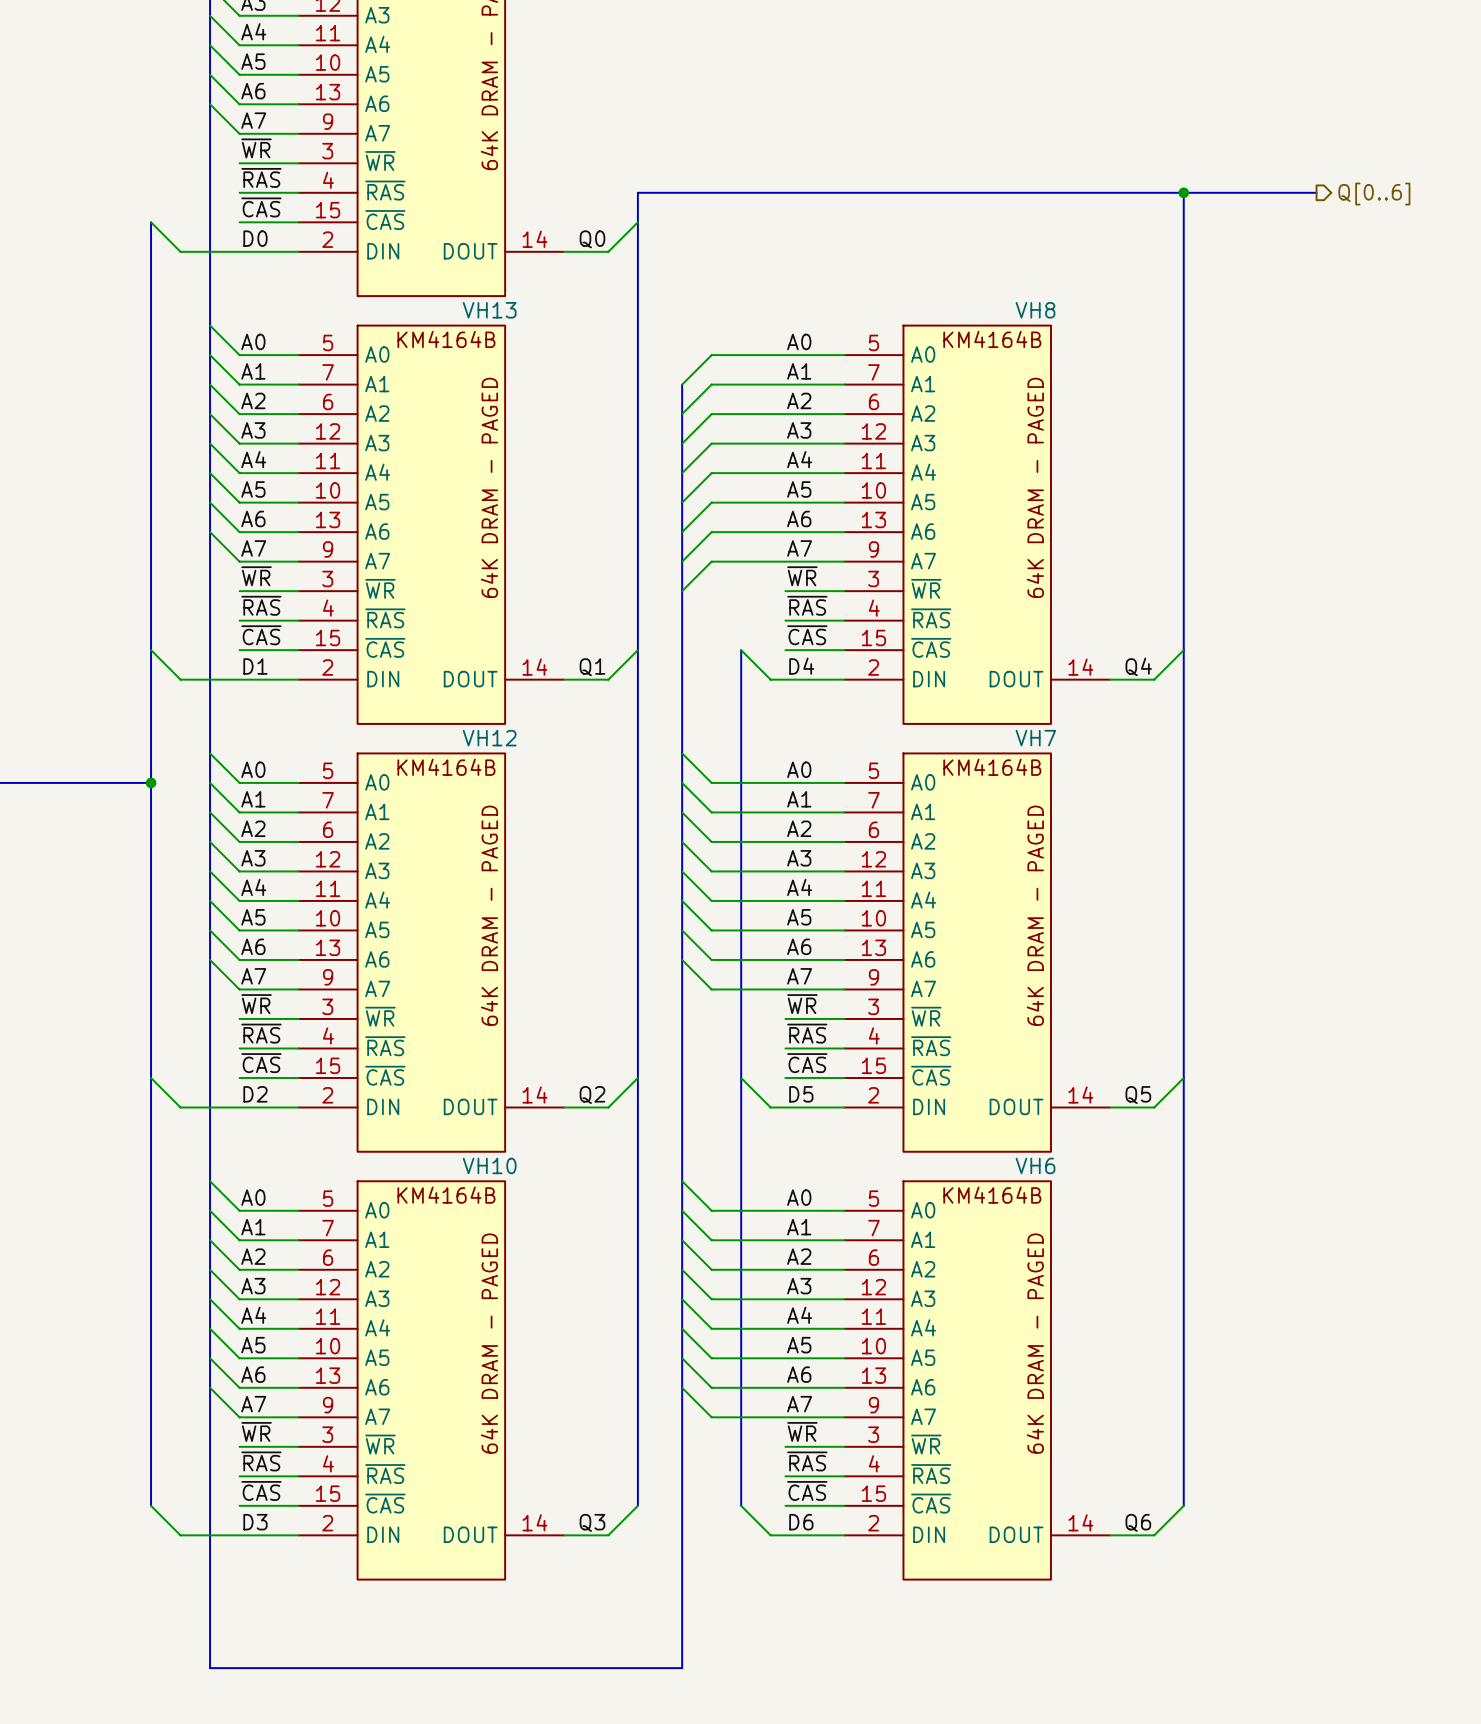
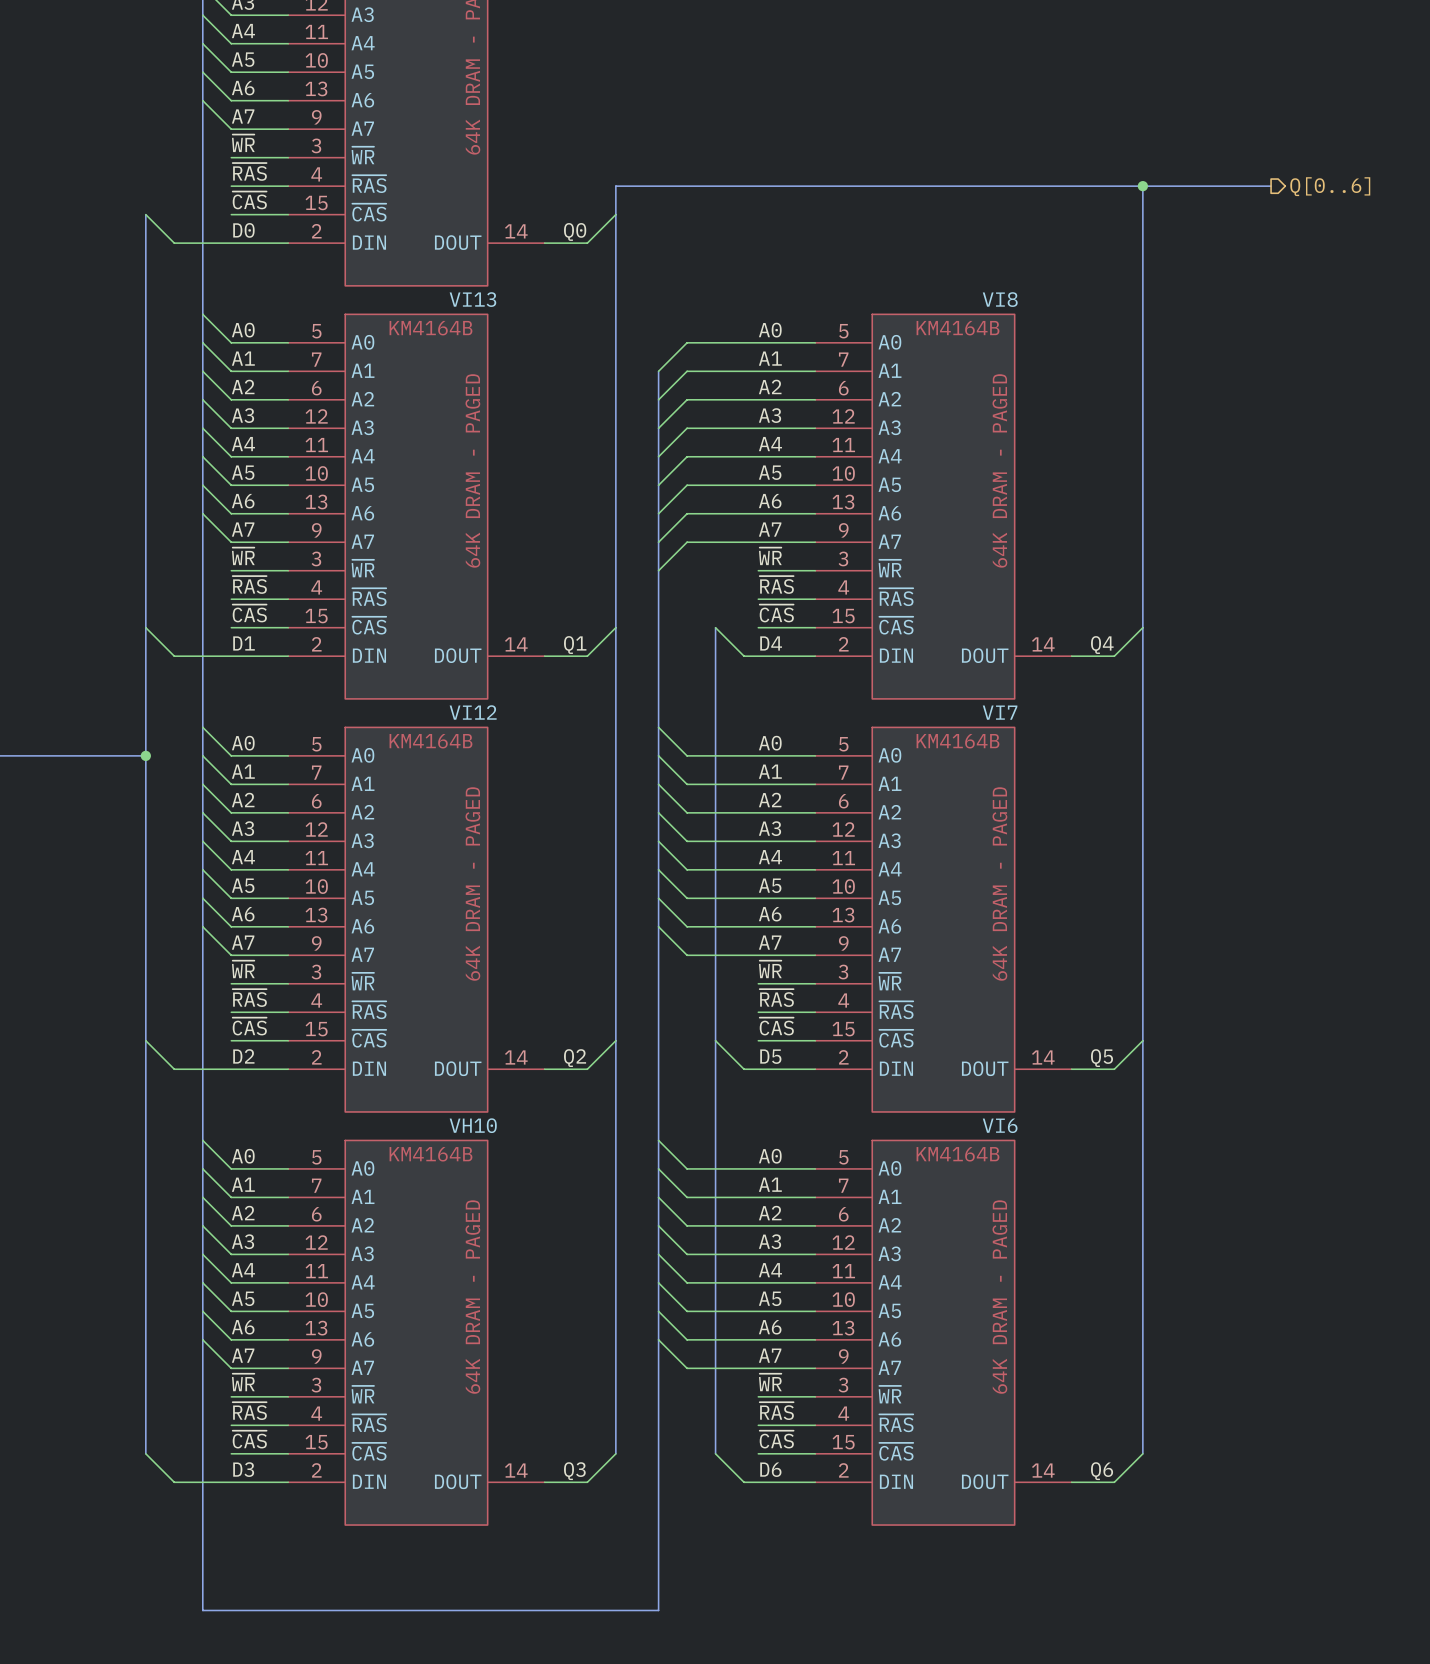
VH13 name: VH13 (489, 310) -> VI13 (472, 299)
VH8 name: VH8 (1035, 310) -> VI8 (1000, 299)
VH12 name: VH12 (489, 738) -> VI12 (473, 712)
VH7 name: VH7 (1035, 738) -> VI7 (1000, 712)
VH6 name: VH6 (1035, 1165) -> VI6 (1000, 1125)

